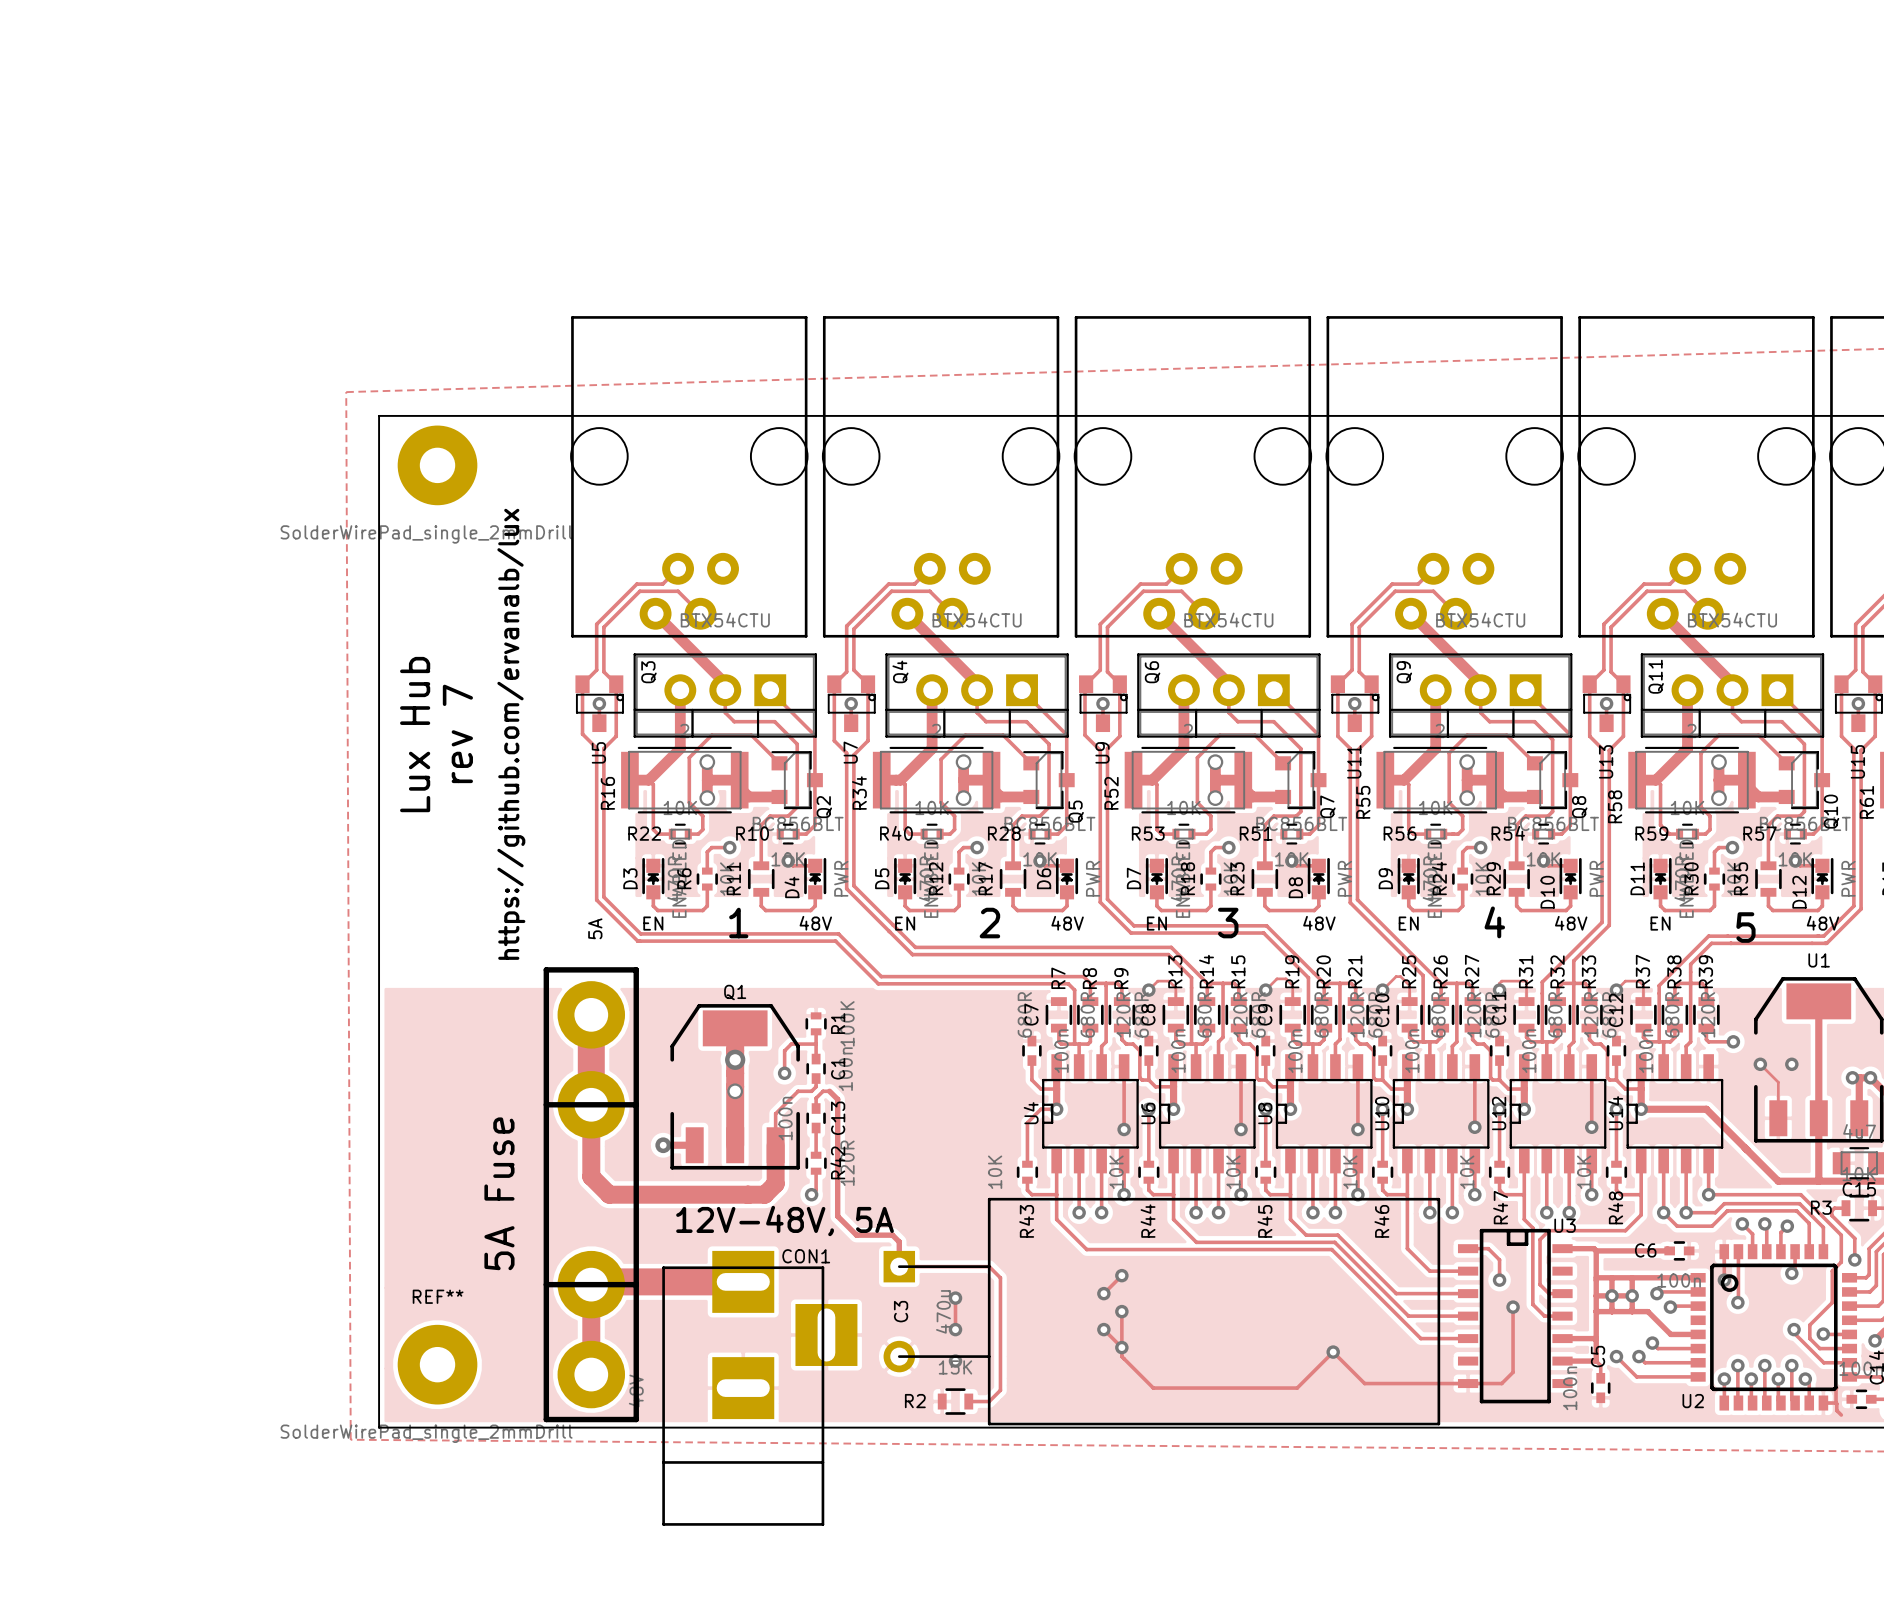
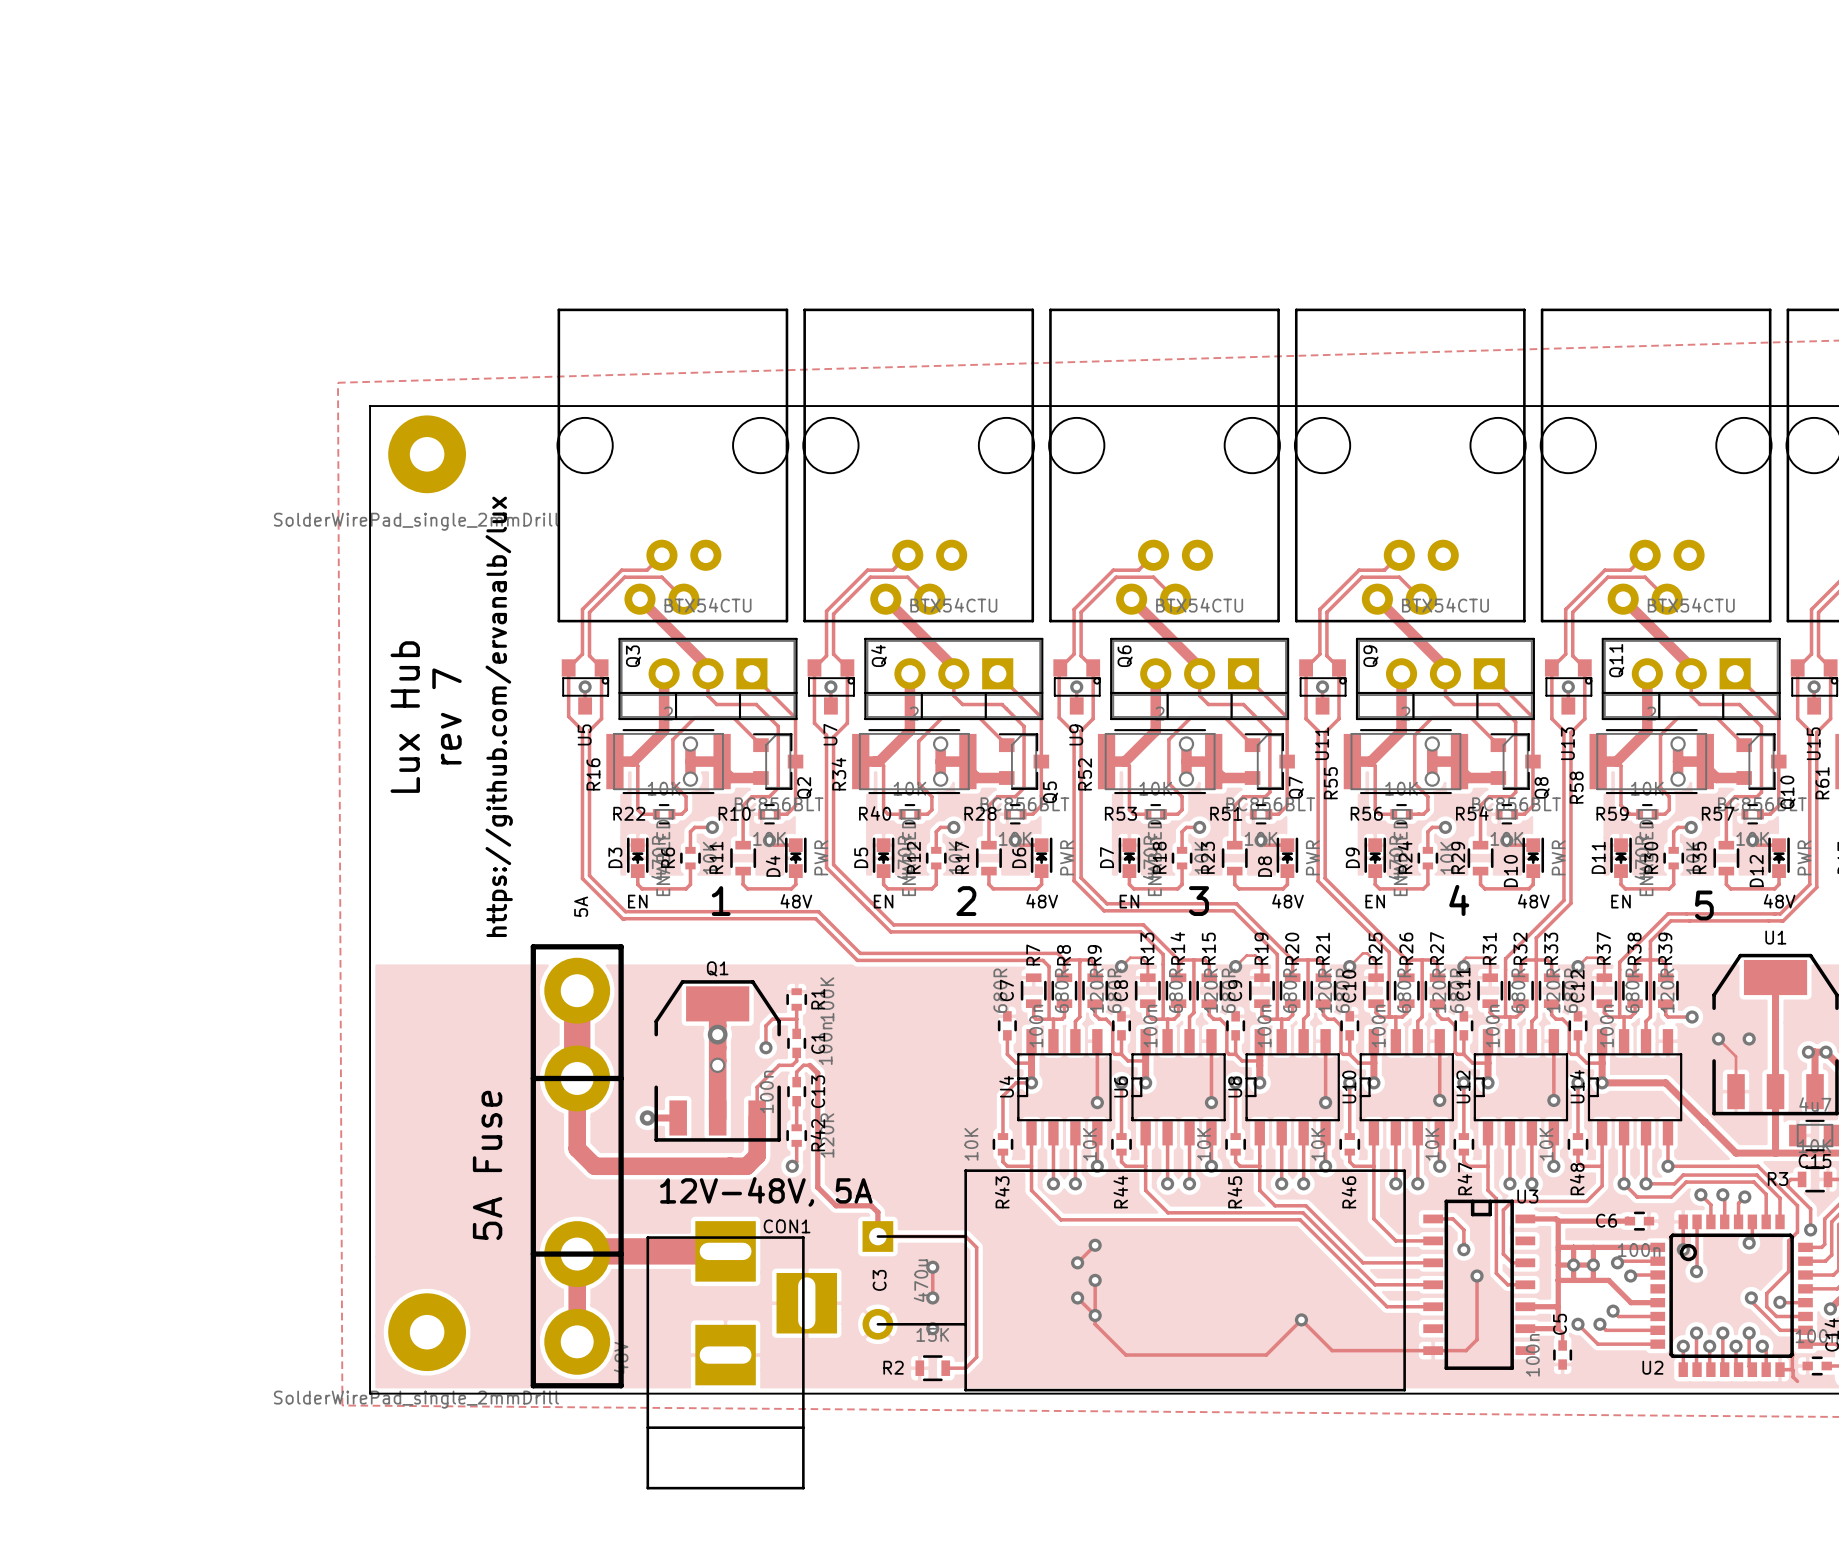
REF** name: REF** (438, 1296) -> none

